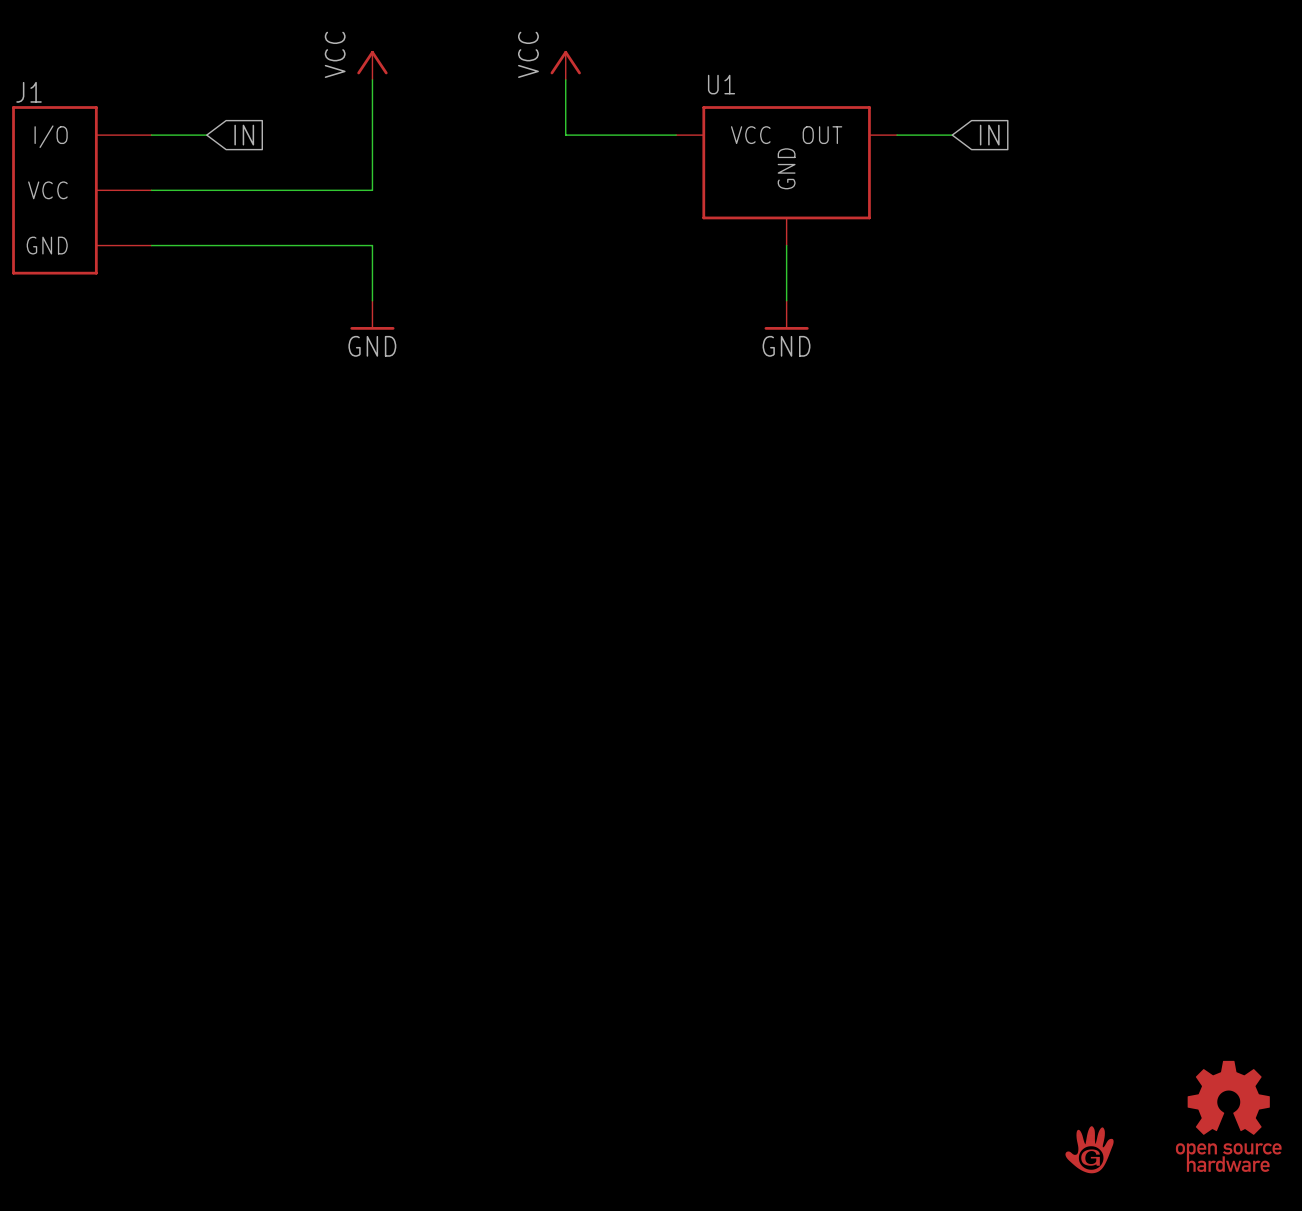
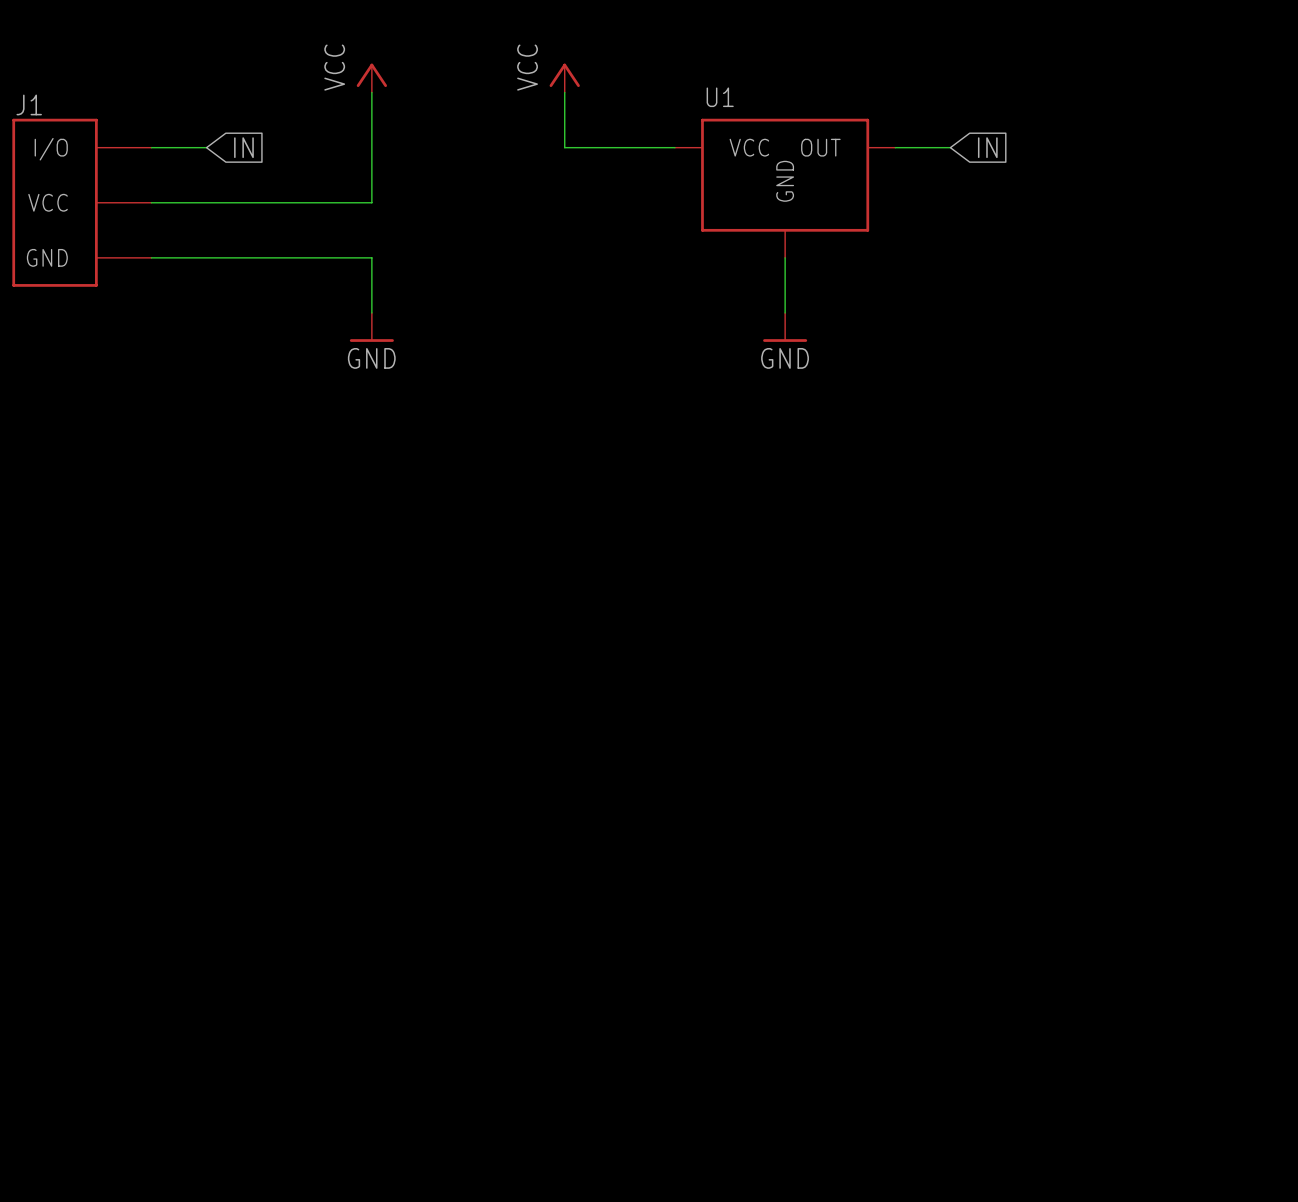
part: (1228, 1116) -> none
part: (1089, 1149) -> none

